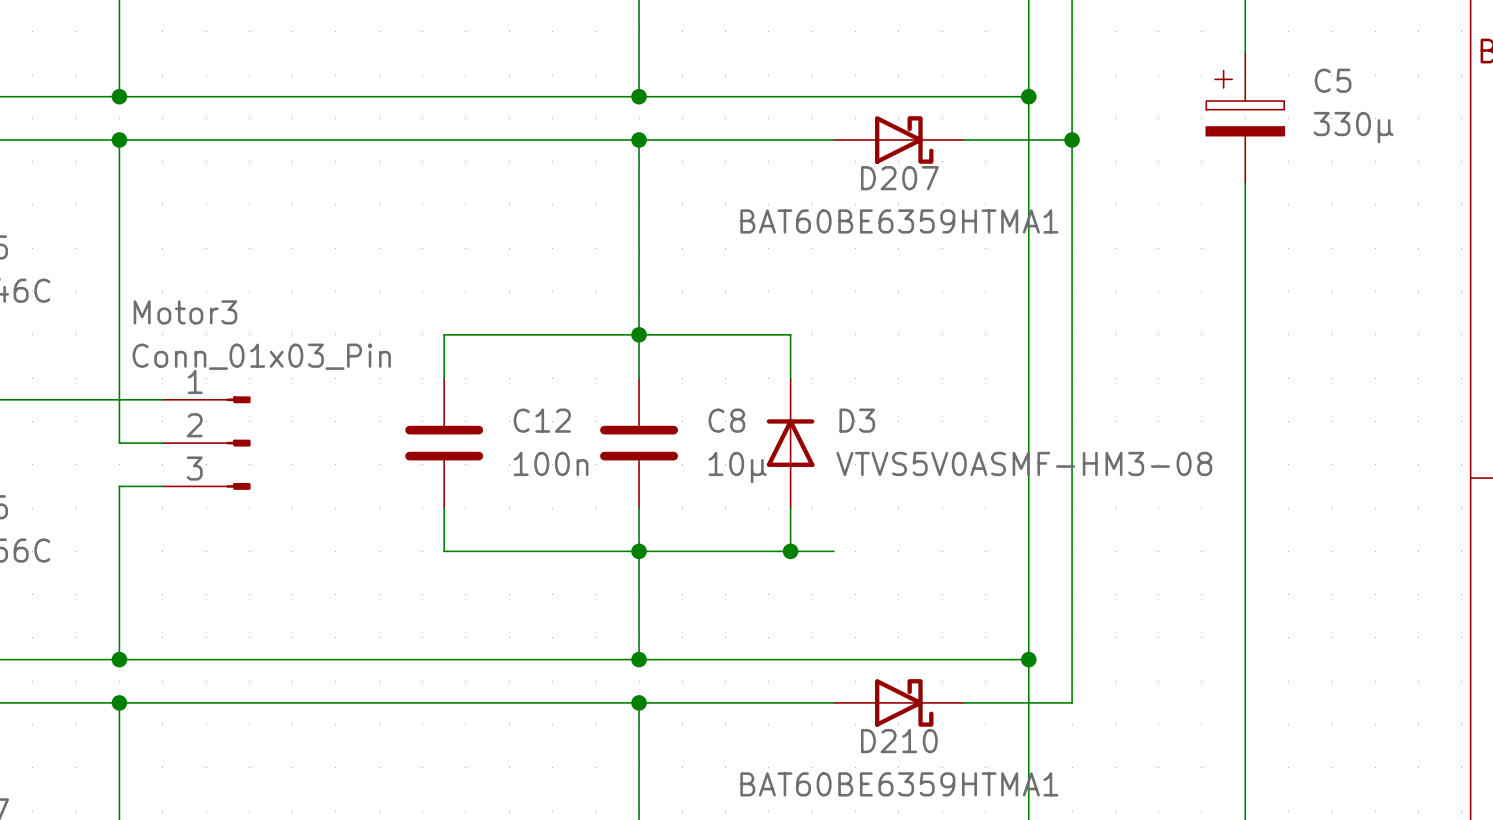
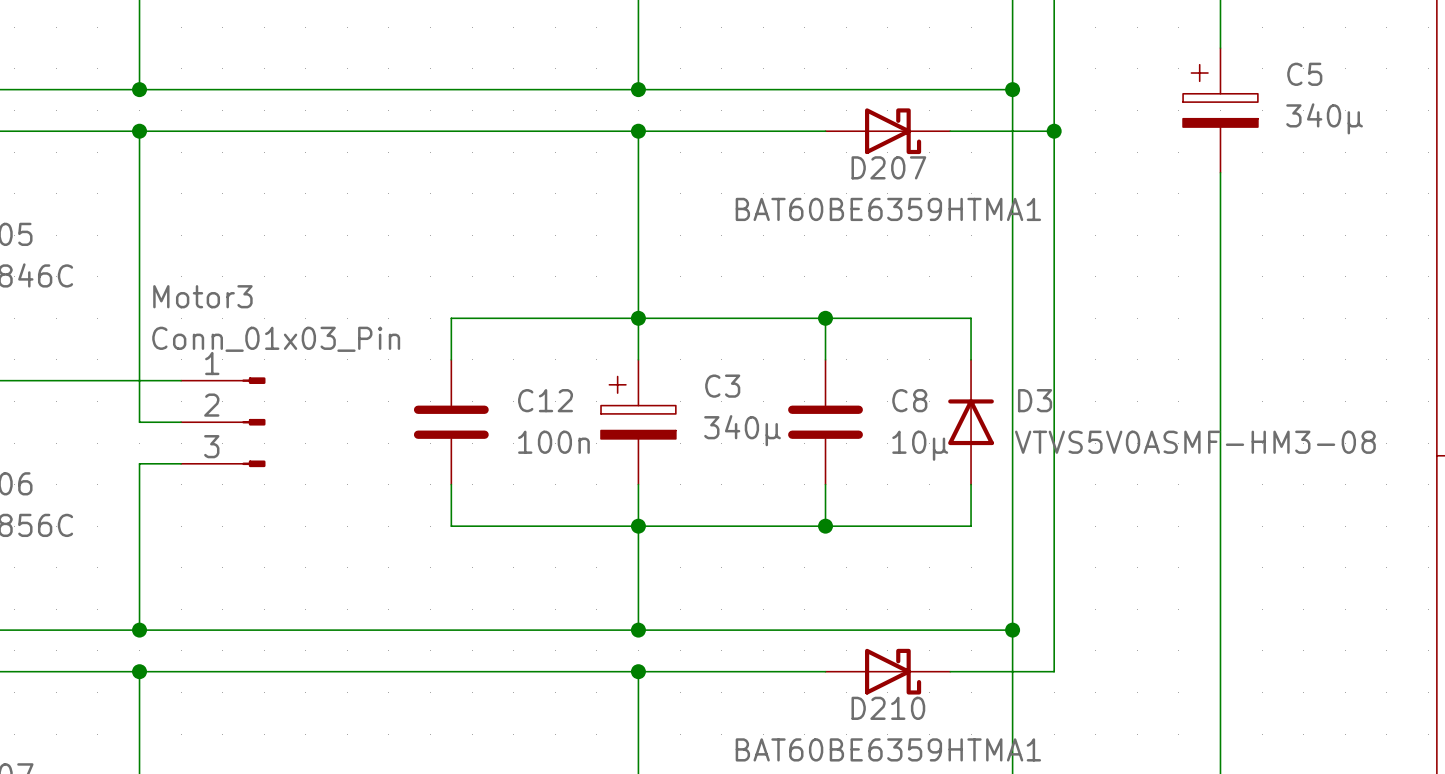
C5 value: 330µ (1353, 127) -> 340µ (1324, 118)
wire: (790, 334) (790, 378) -> (783, 318) (971, 318) (971, 359)
junction: none -> (825, 318)
C8 position: (639, 443) -> (825, 422)
C3: none -> 340µ (638, 422)
D3 position: (790, 443) -> (971, 422)
wire: (790, 508) (790, 551) -> (825, 318) (825, 359)
wire: none -> (825, 484) (825, 526) (971, 526) (971, 484)
junction position: (790, 551) -> (825, 526)

